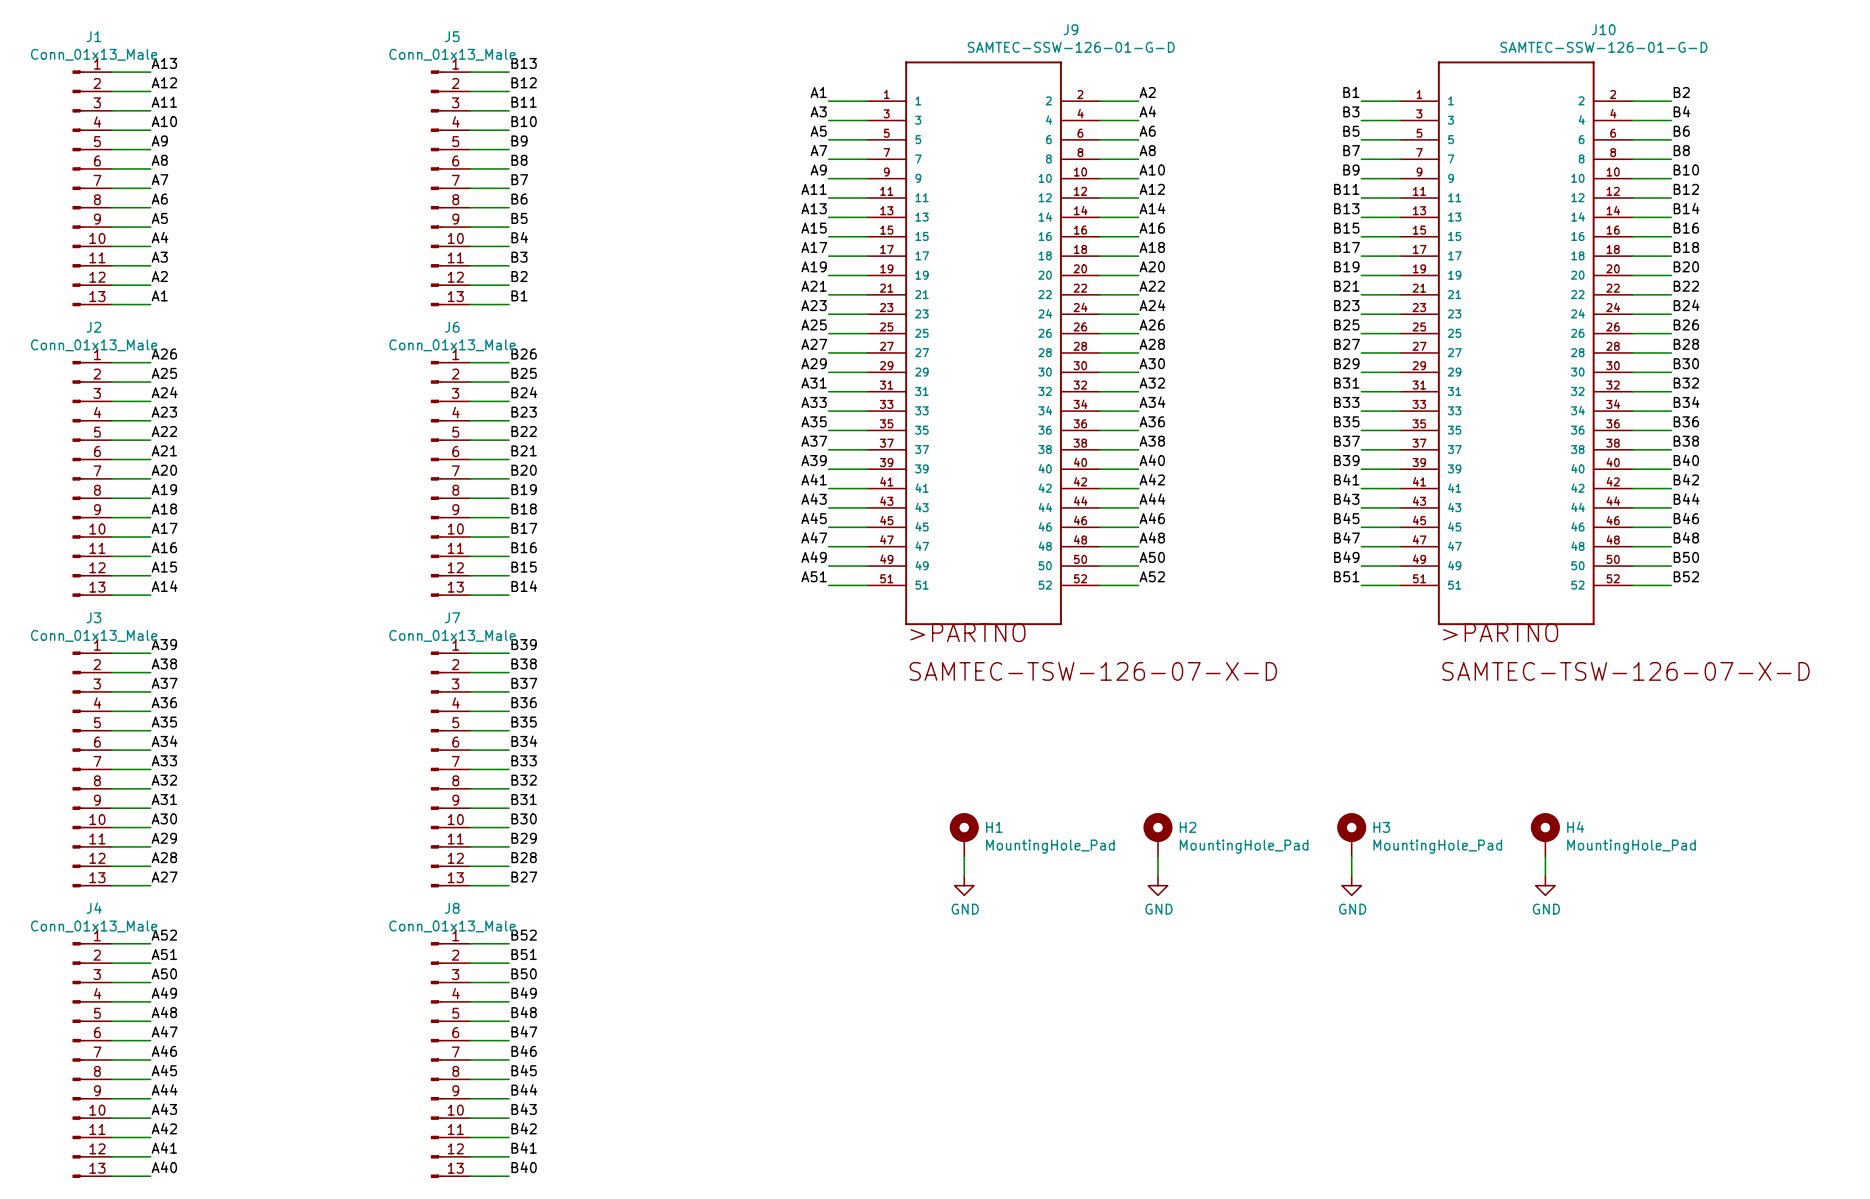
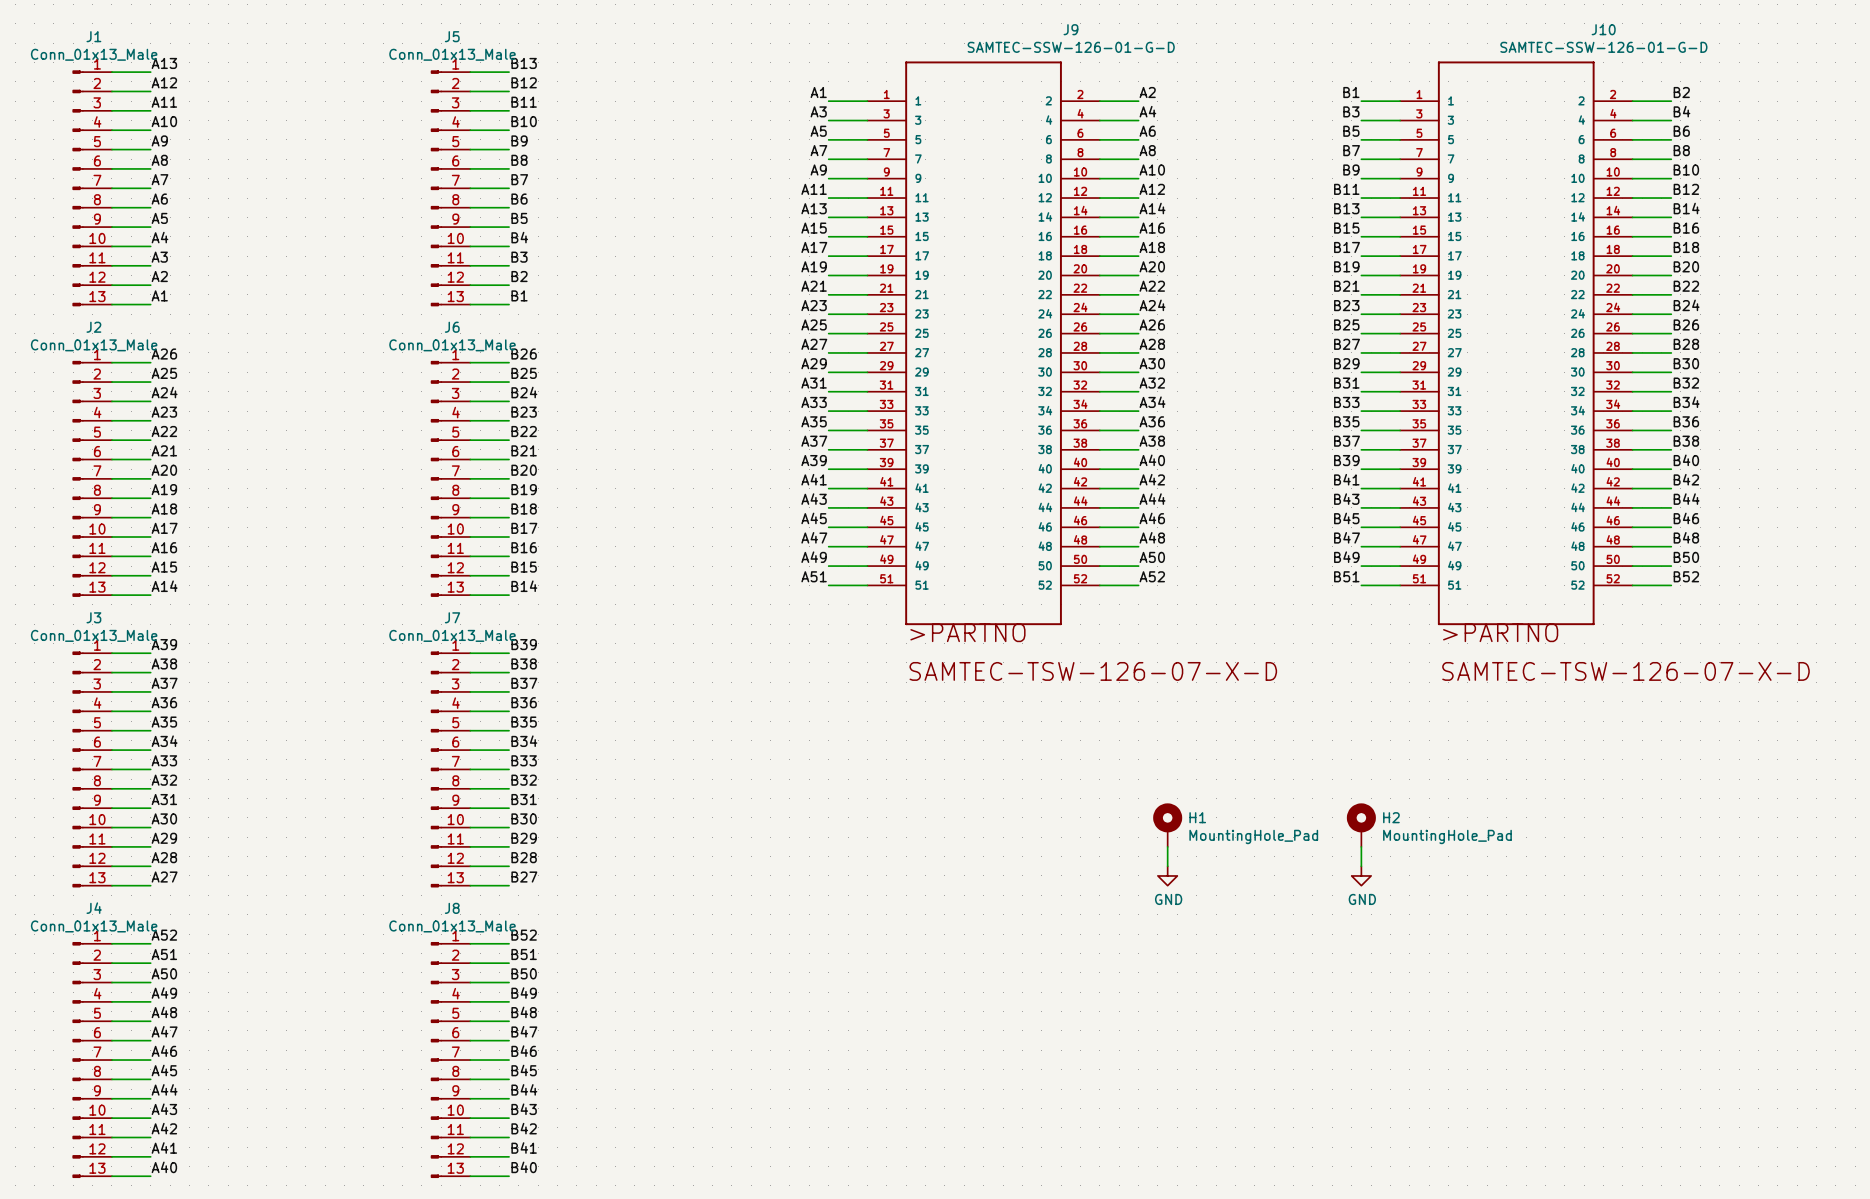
H1 position: (964, 834) -> (1167, 825)
H2 position: (1157, 834) -> (1361, 825)
H3: MountingHole_Pad (1351, 834) -> none
H4: MountingHole_Pad (1545, 834) -> none
wire: (964, 856) (964, 875) -> none
wire: (1157, 856) (1157, 875) -> (1167, 846) (1167, 866)
wire: (1351, 856) (1351, 875) -> (1361, 846) (1361, 866)
wire: (1545, 856) (1545, 875) -> none
power symbol: GND (964, 885) -> none
power symbol position: GND (1157, 885) -> GND (1167, 875)
power symbol position: GND (1351, 885) -> GND (1361, 875)
power symbol: GND (1545, 885) -> none

